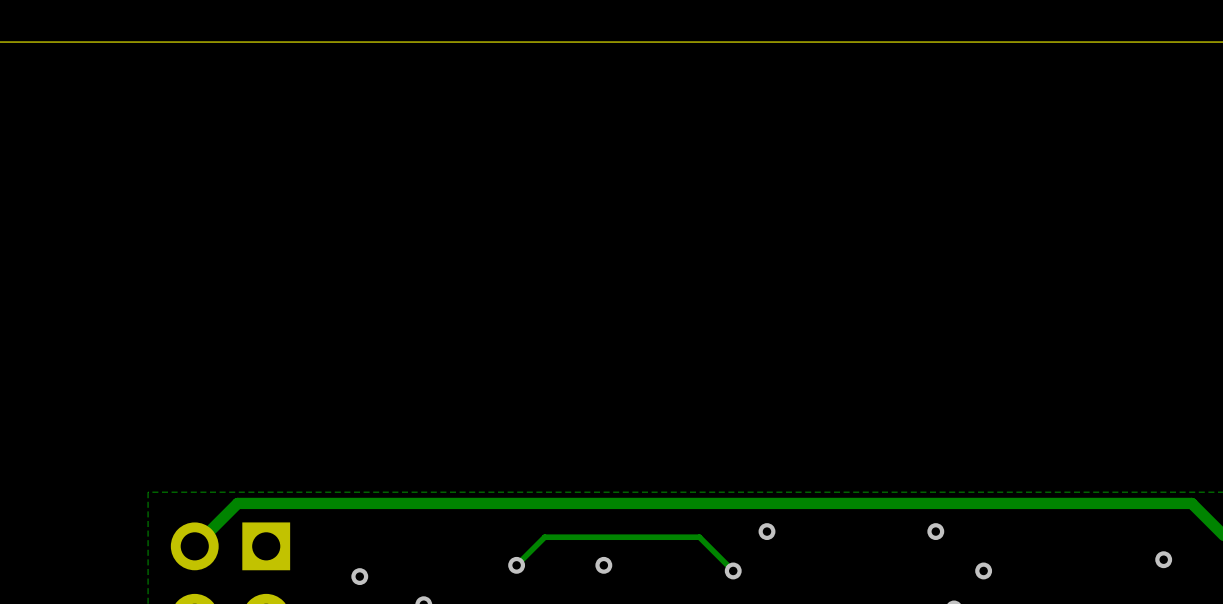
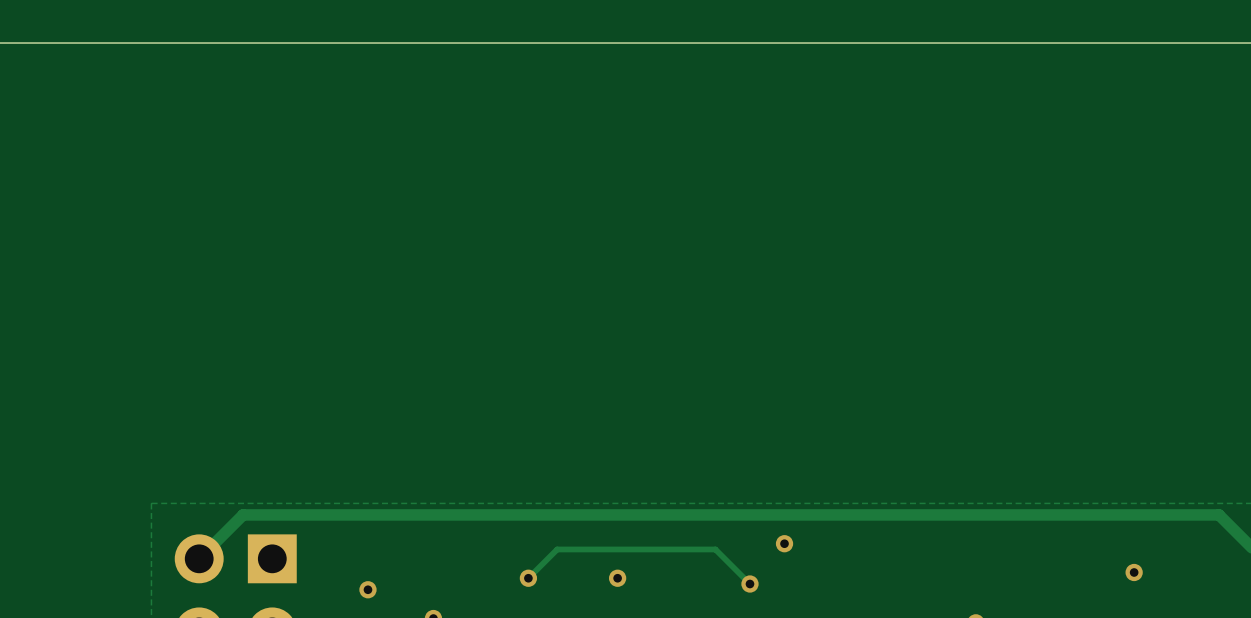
via: (935, 531) -> none
via position: (1163, 559) -> (1134, 572)
via: (983, 570) -> none

